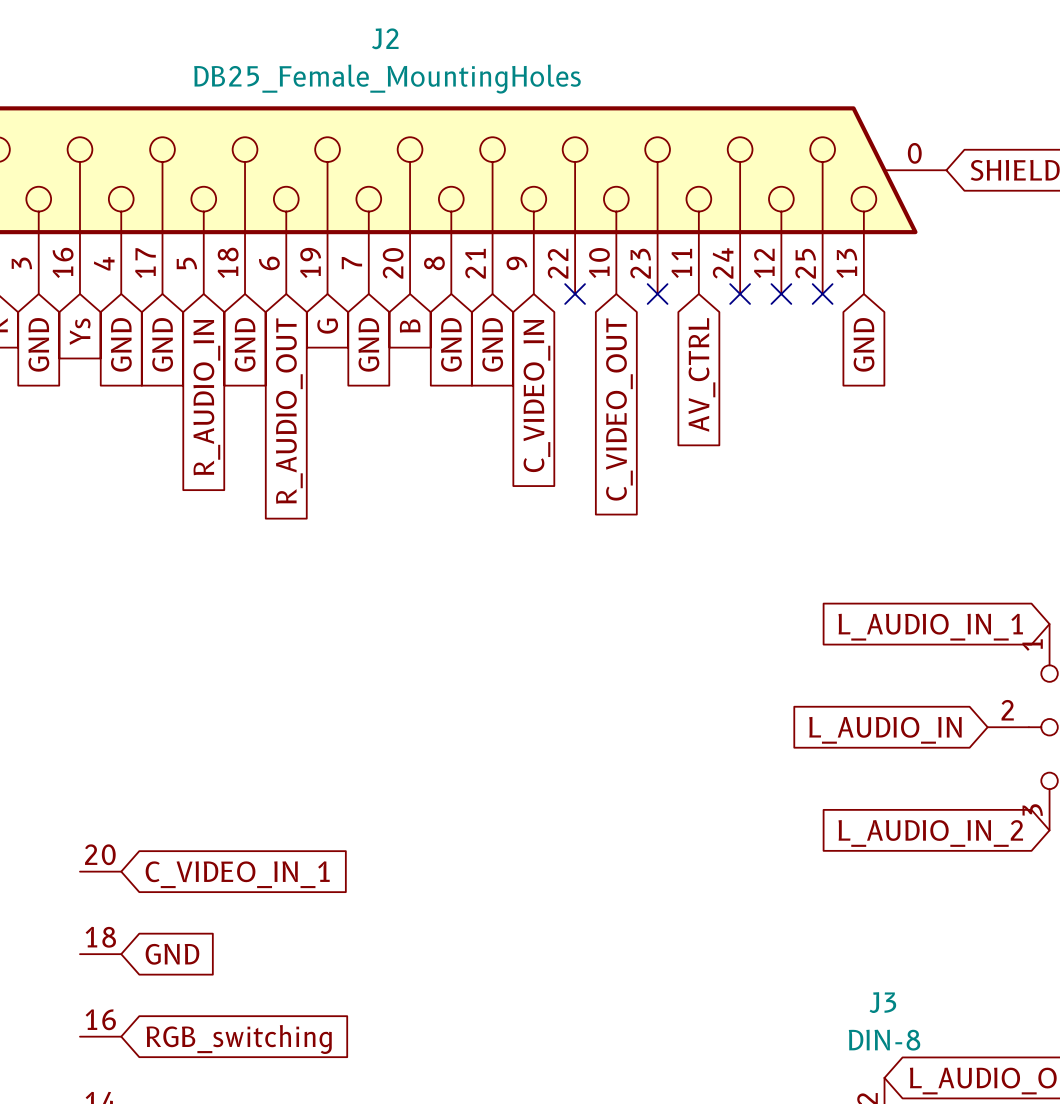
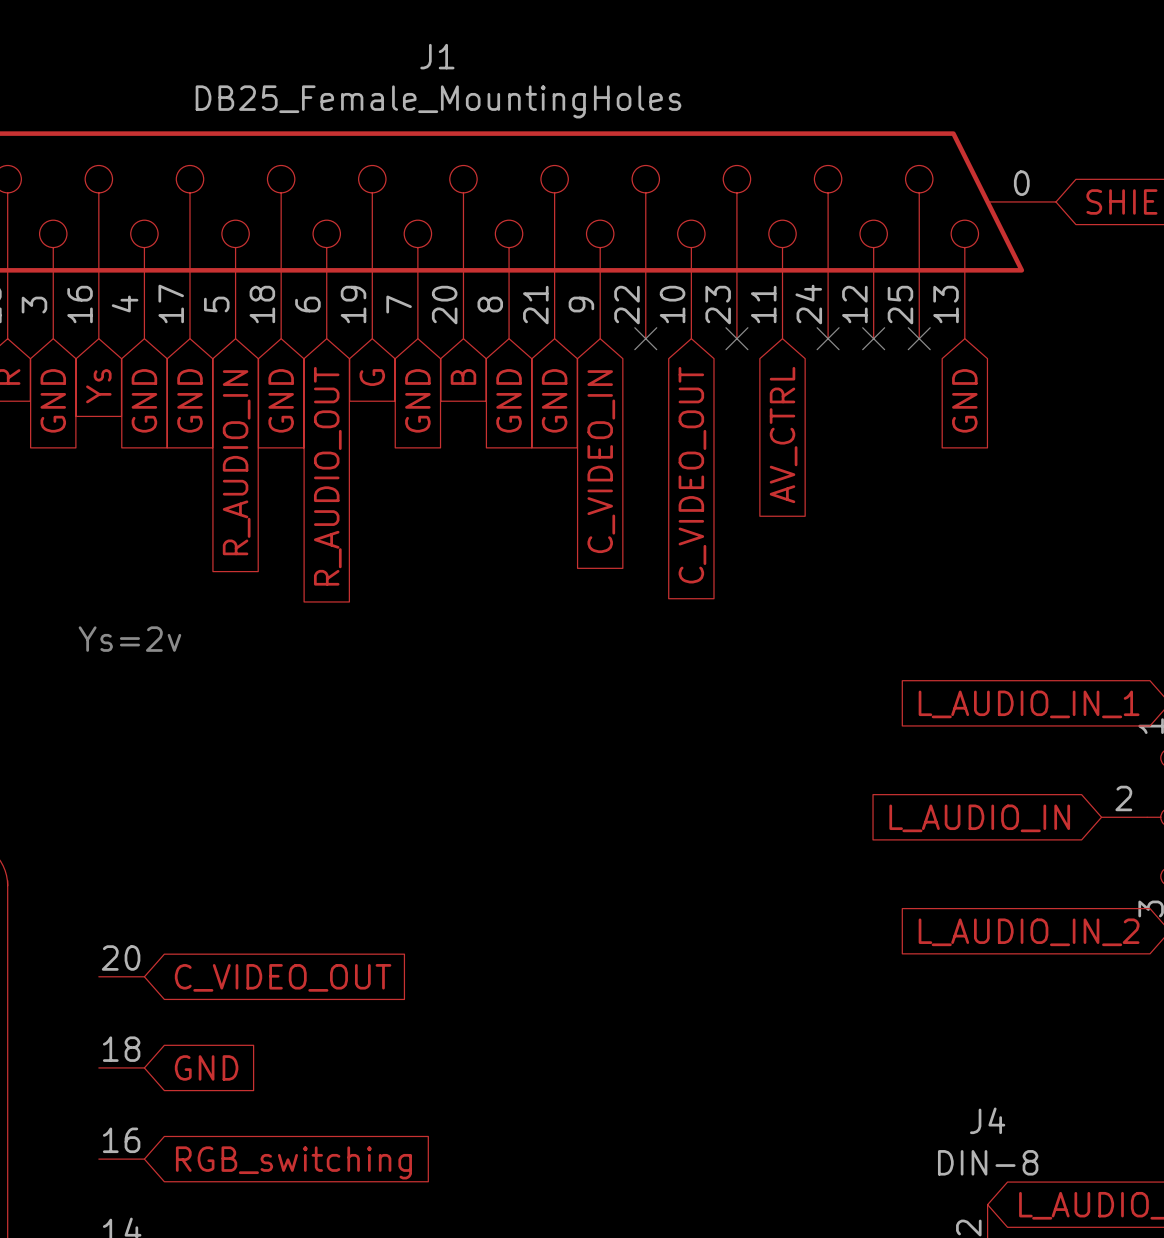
J2 name: J2 (385, 38) -> J1 (437, 56)
text: none -> Ys=2v (129, 639)
global label: C_VIDEO_IN_1 (237, 874) -> C_VIDEO_OUT (283, 977)
J3 name: J3 (882, 1002) -> J4 (987, 1120)

